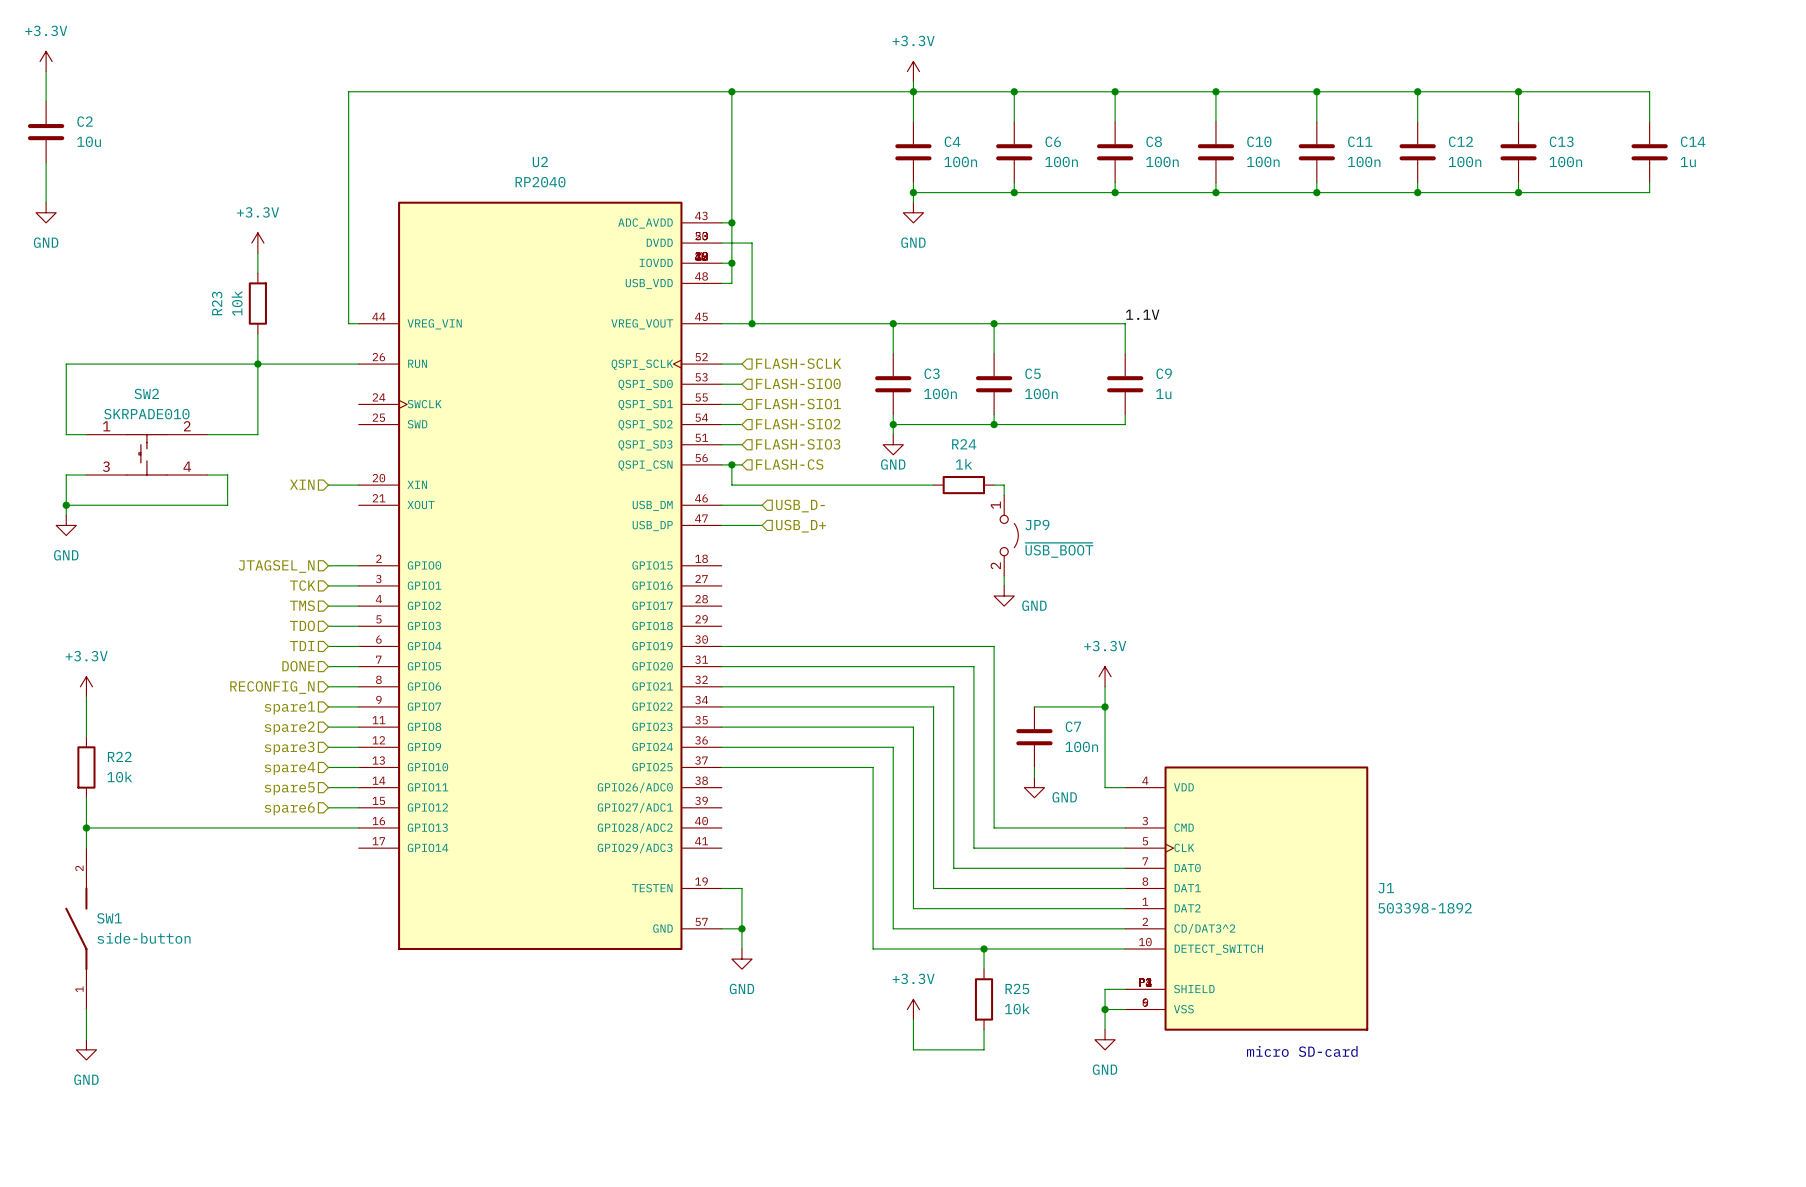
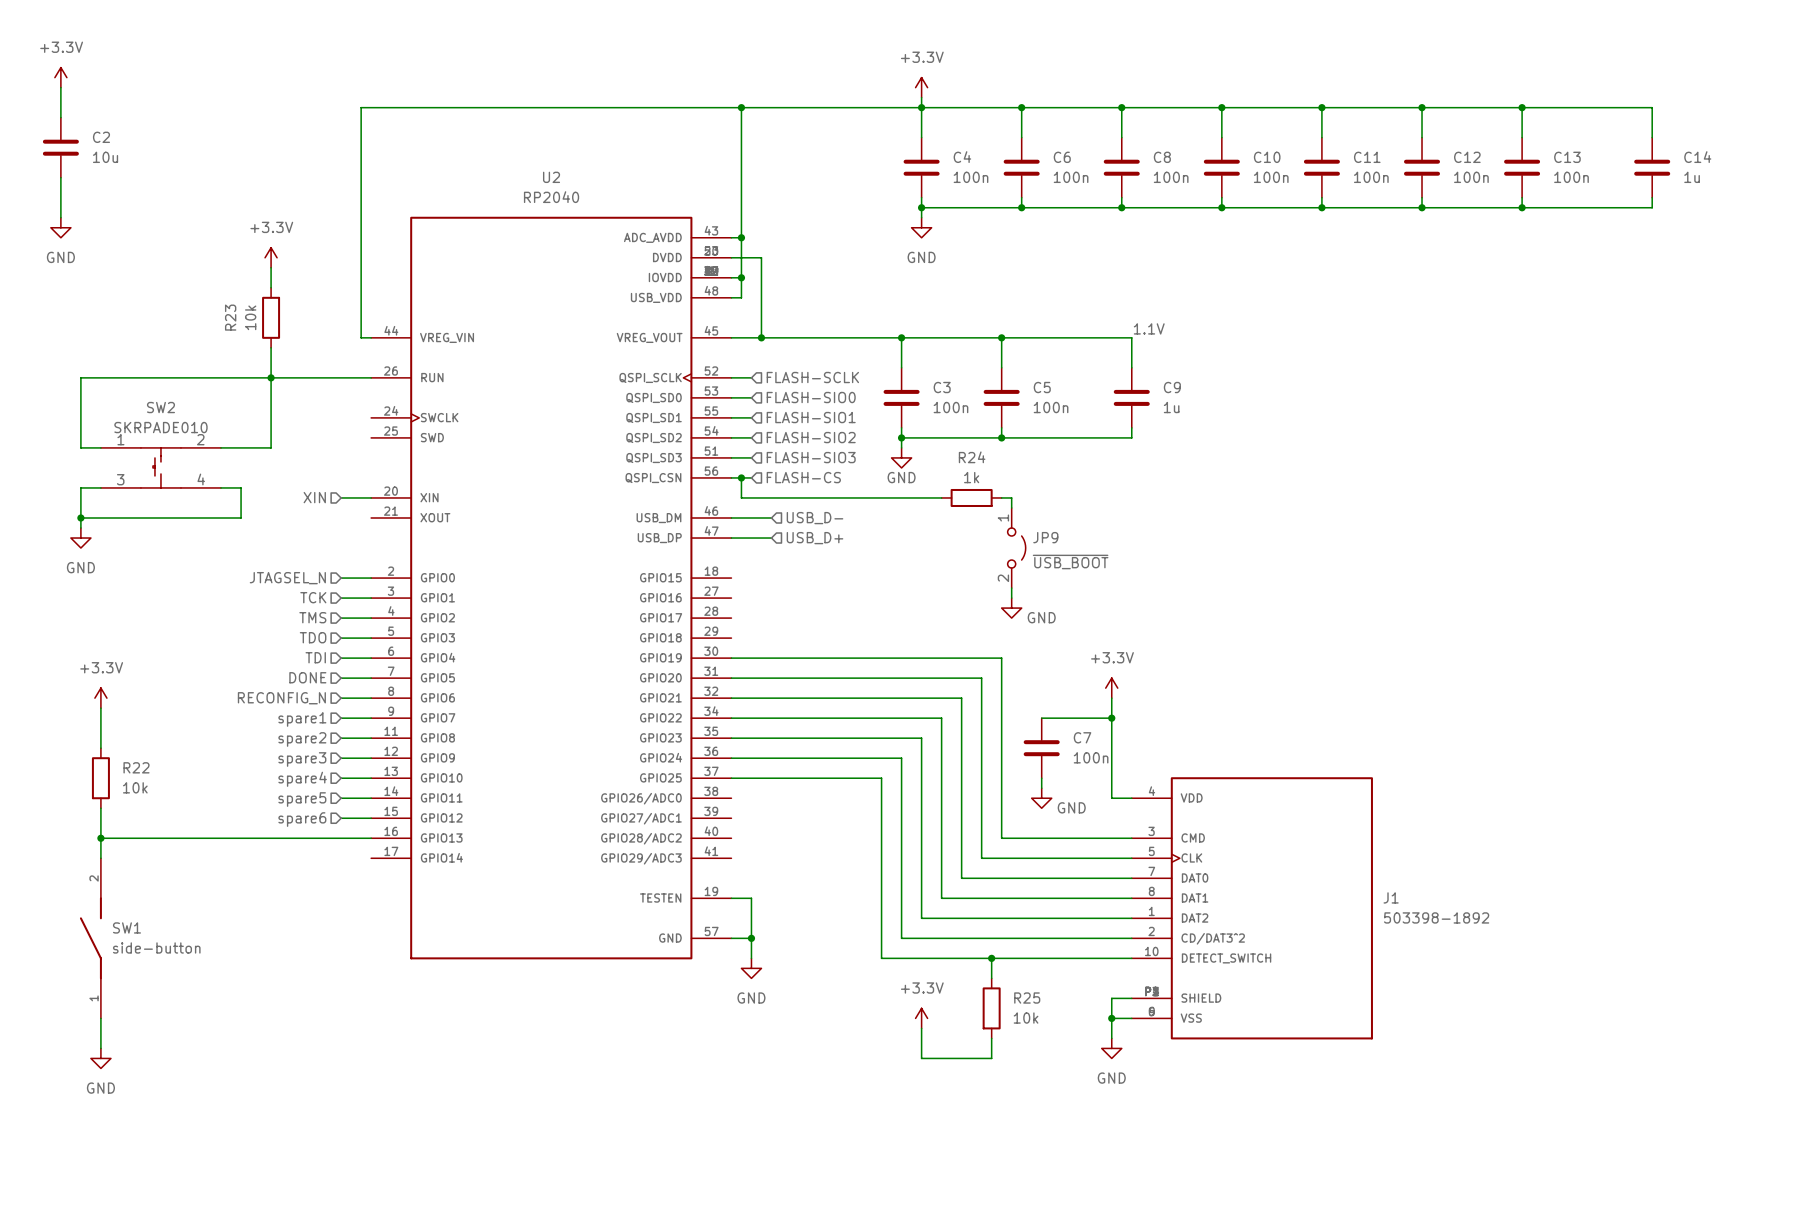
text: micro SD-card (1302, 1051) -> none

